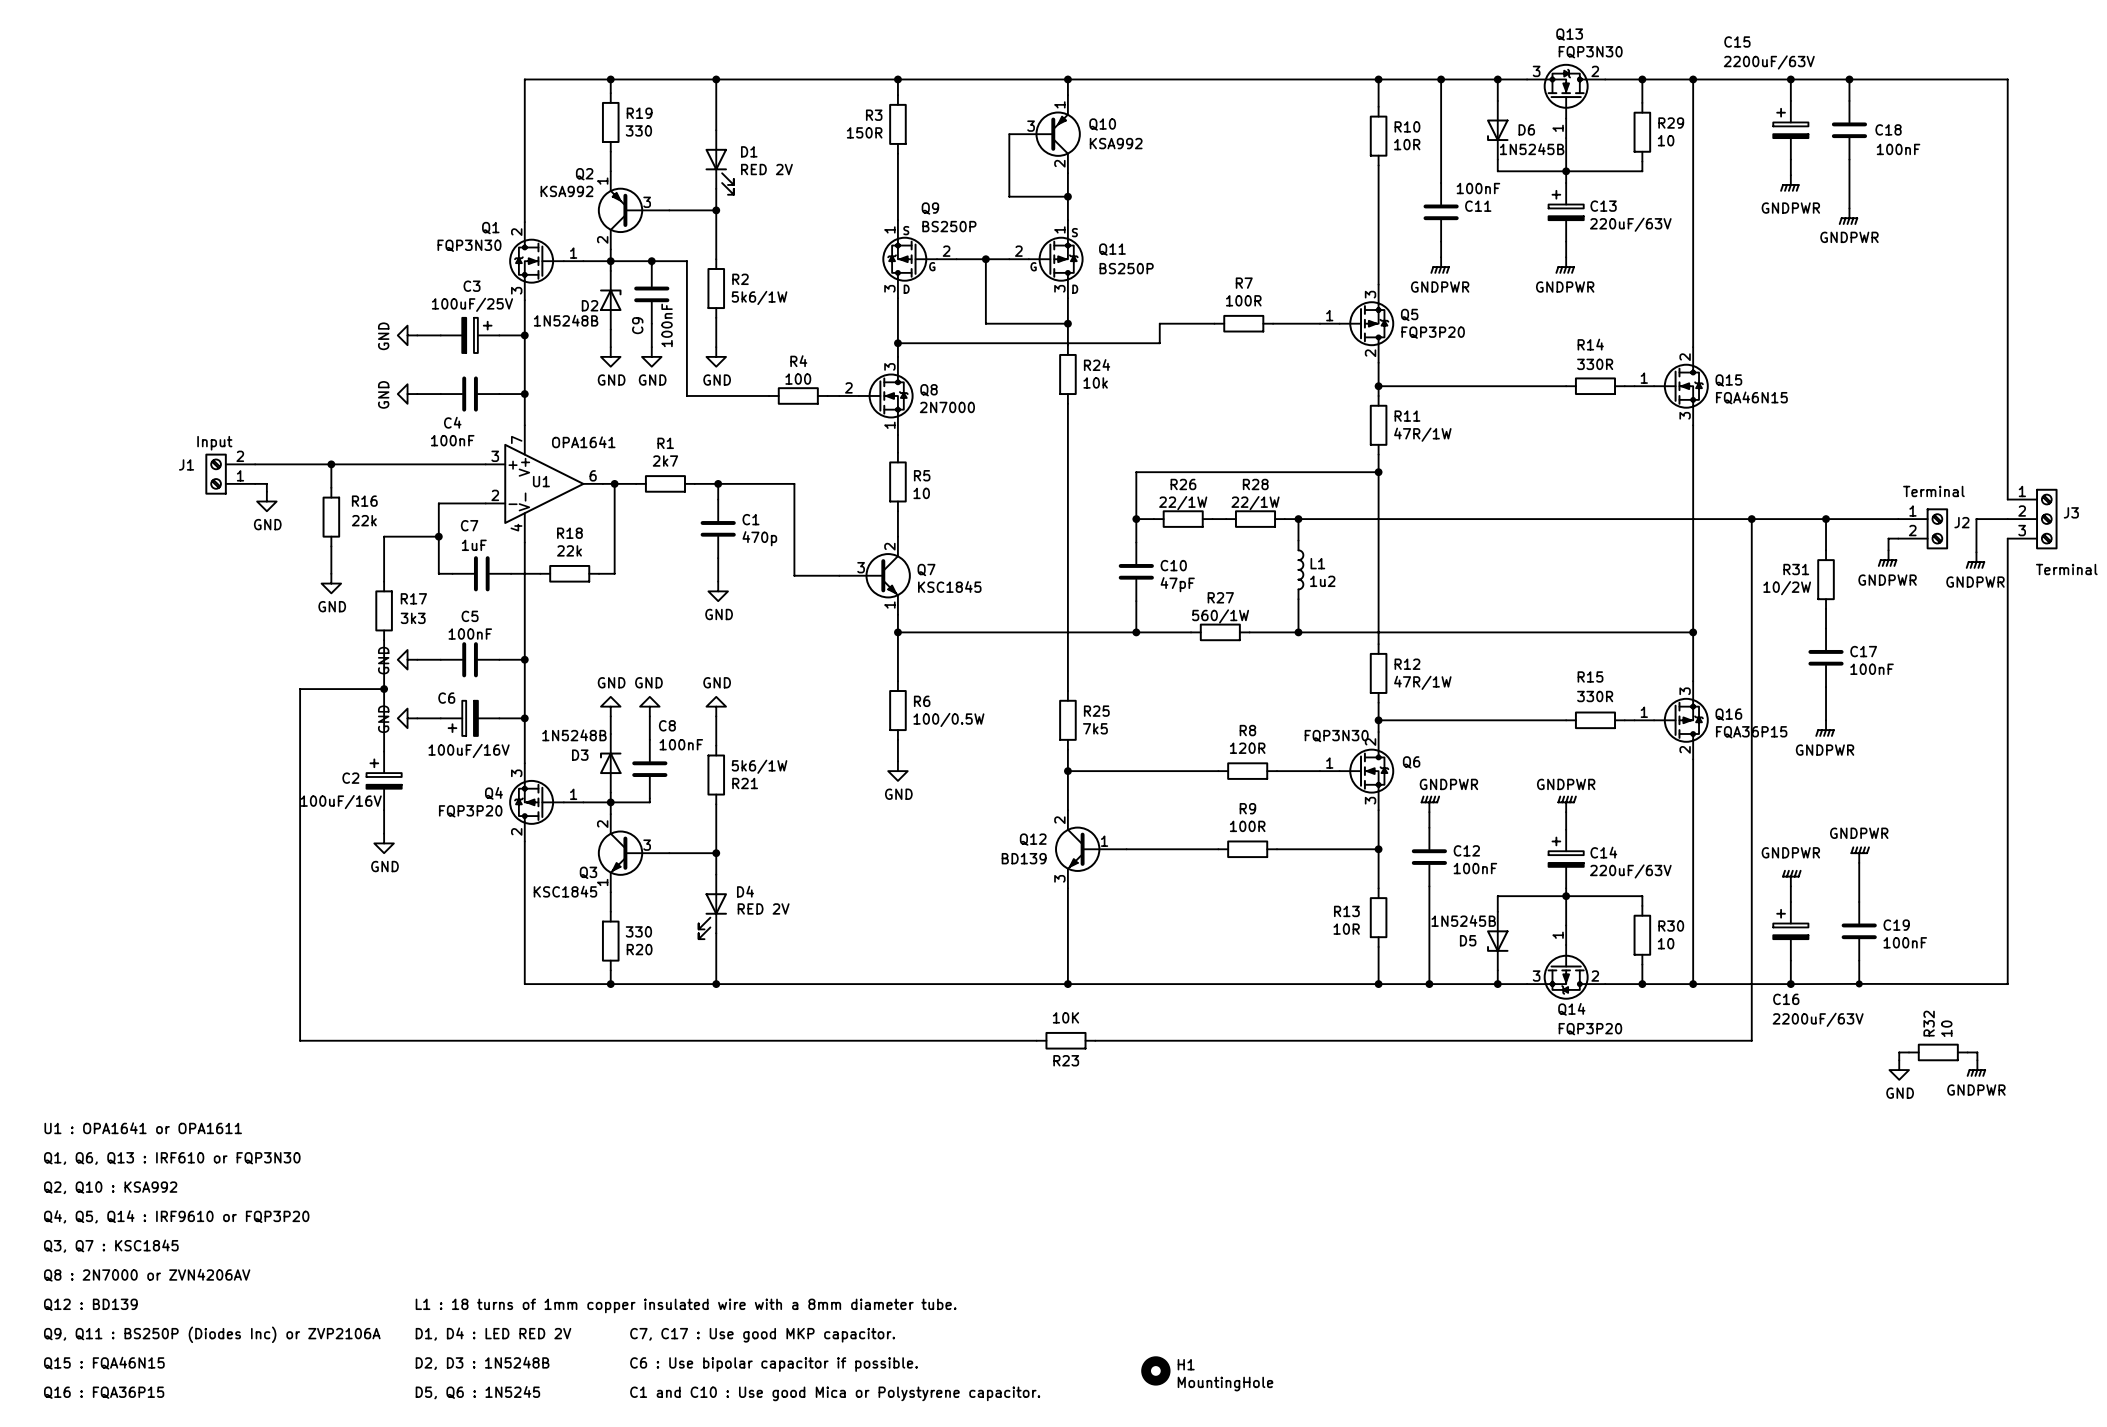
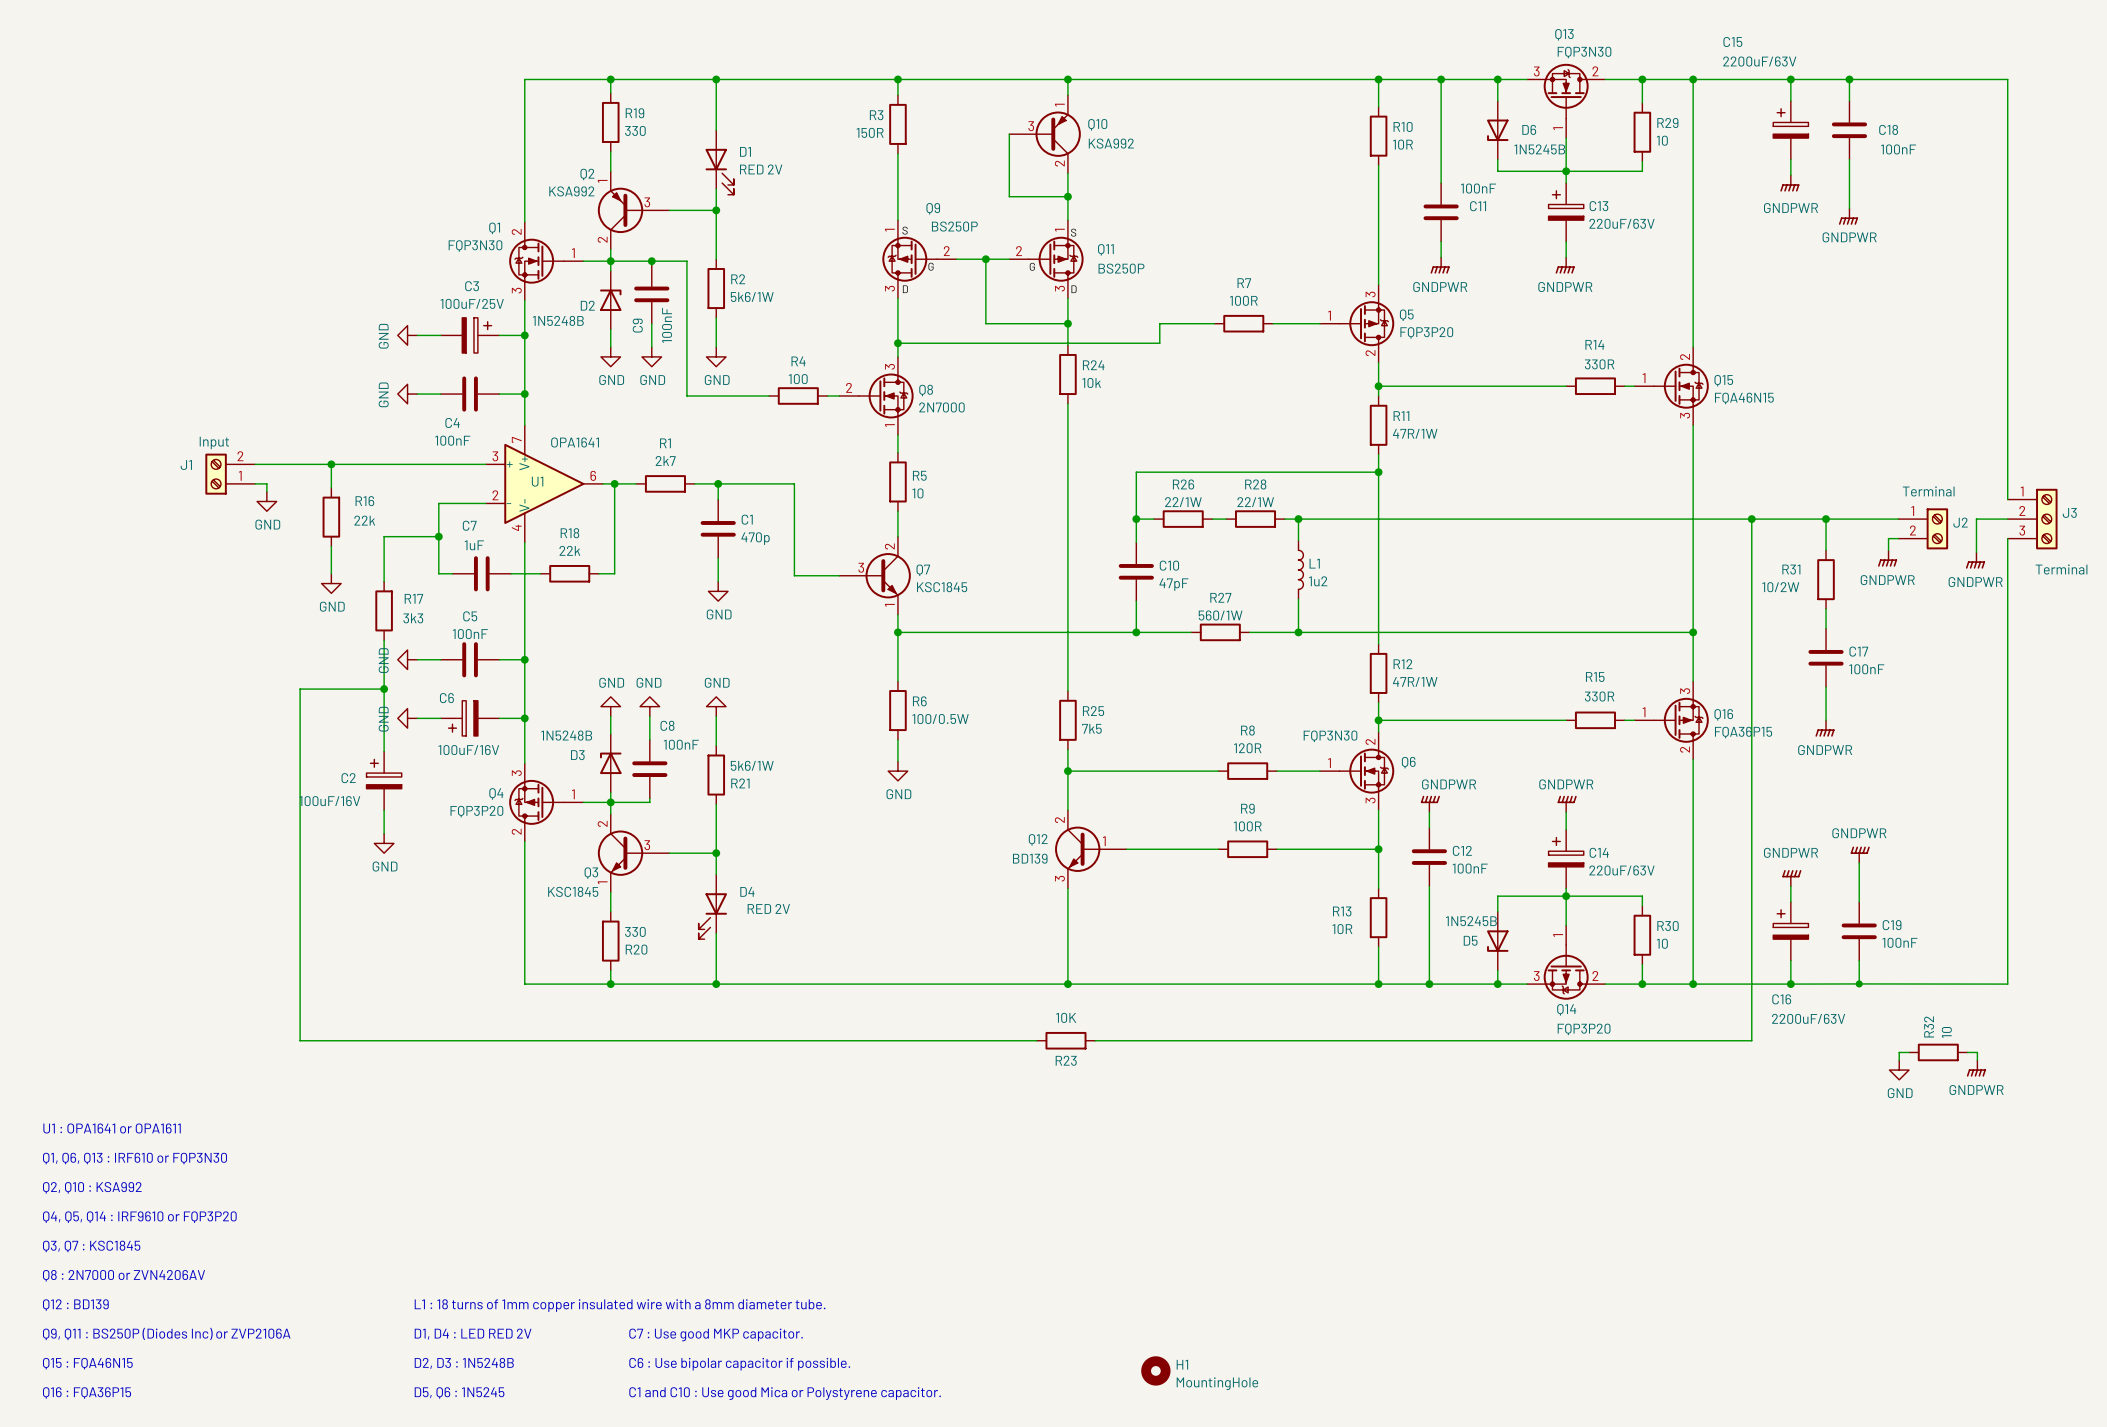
text: C7, C17 : Use good MKP capacitor. (762, 1335) -> C7 : Use good MKP capacitor. (716, 1334)

